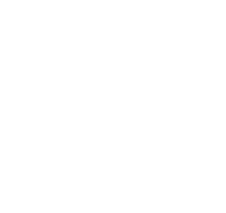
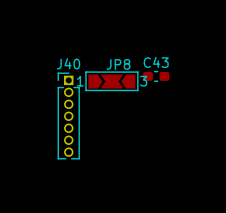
C43: none -> (156, 76)
JP8: none -> (111, 81)
J40: none -> (68, 115)

